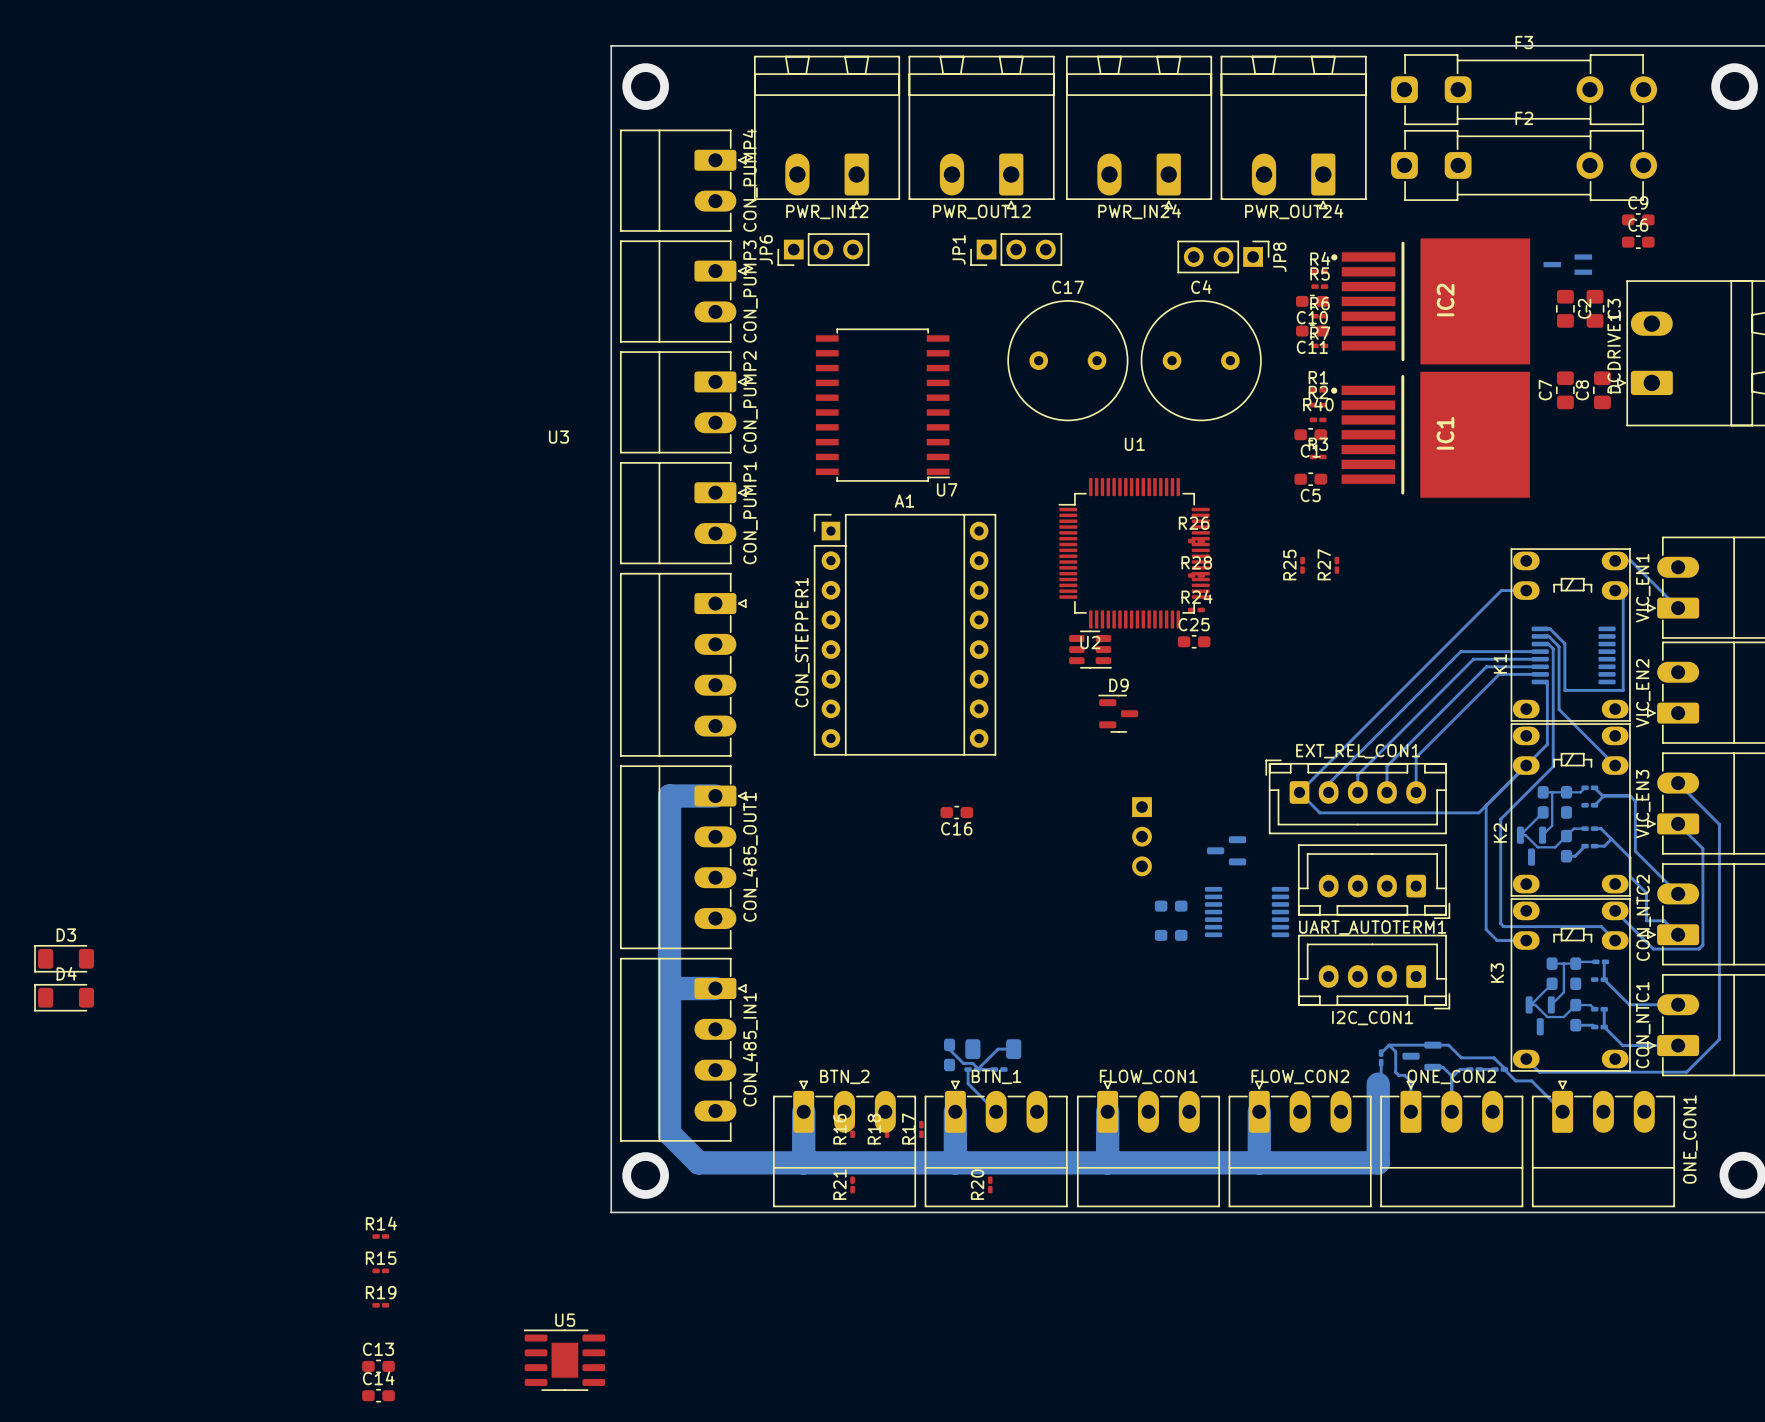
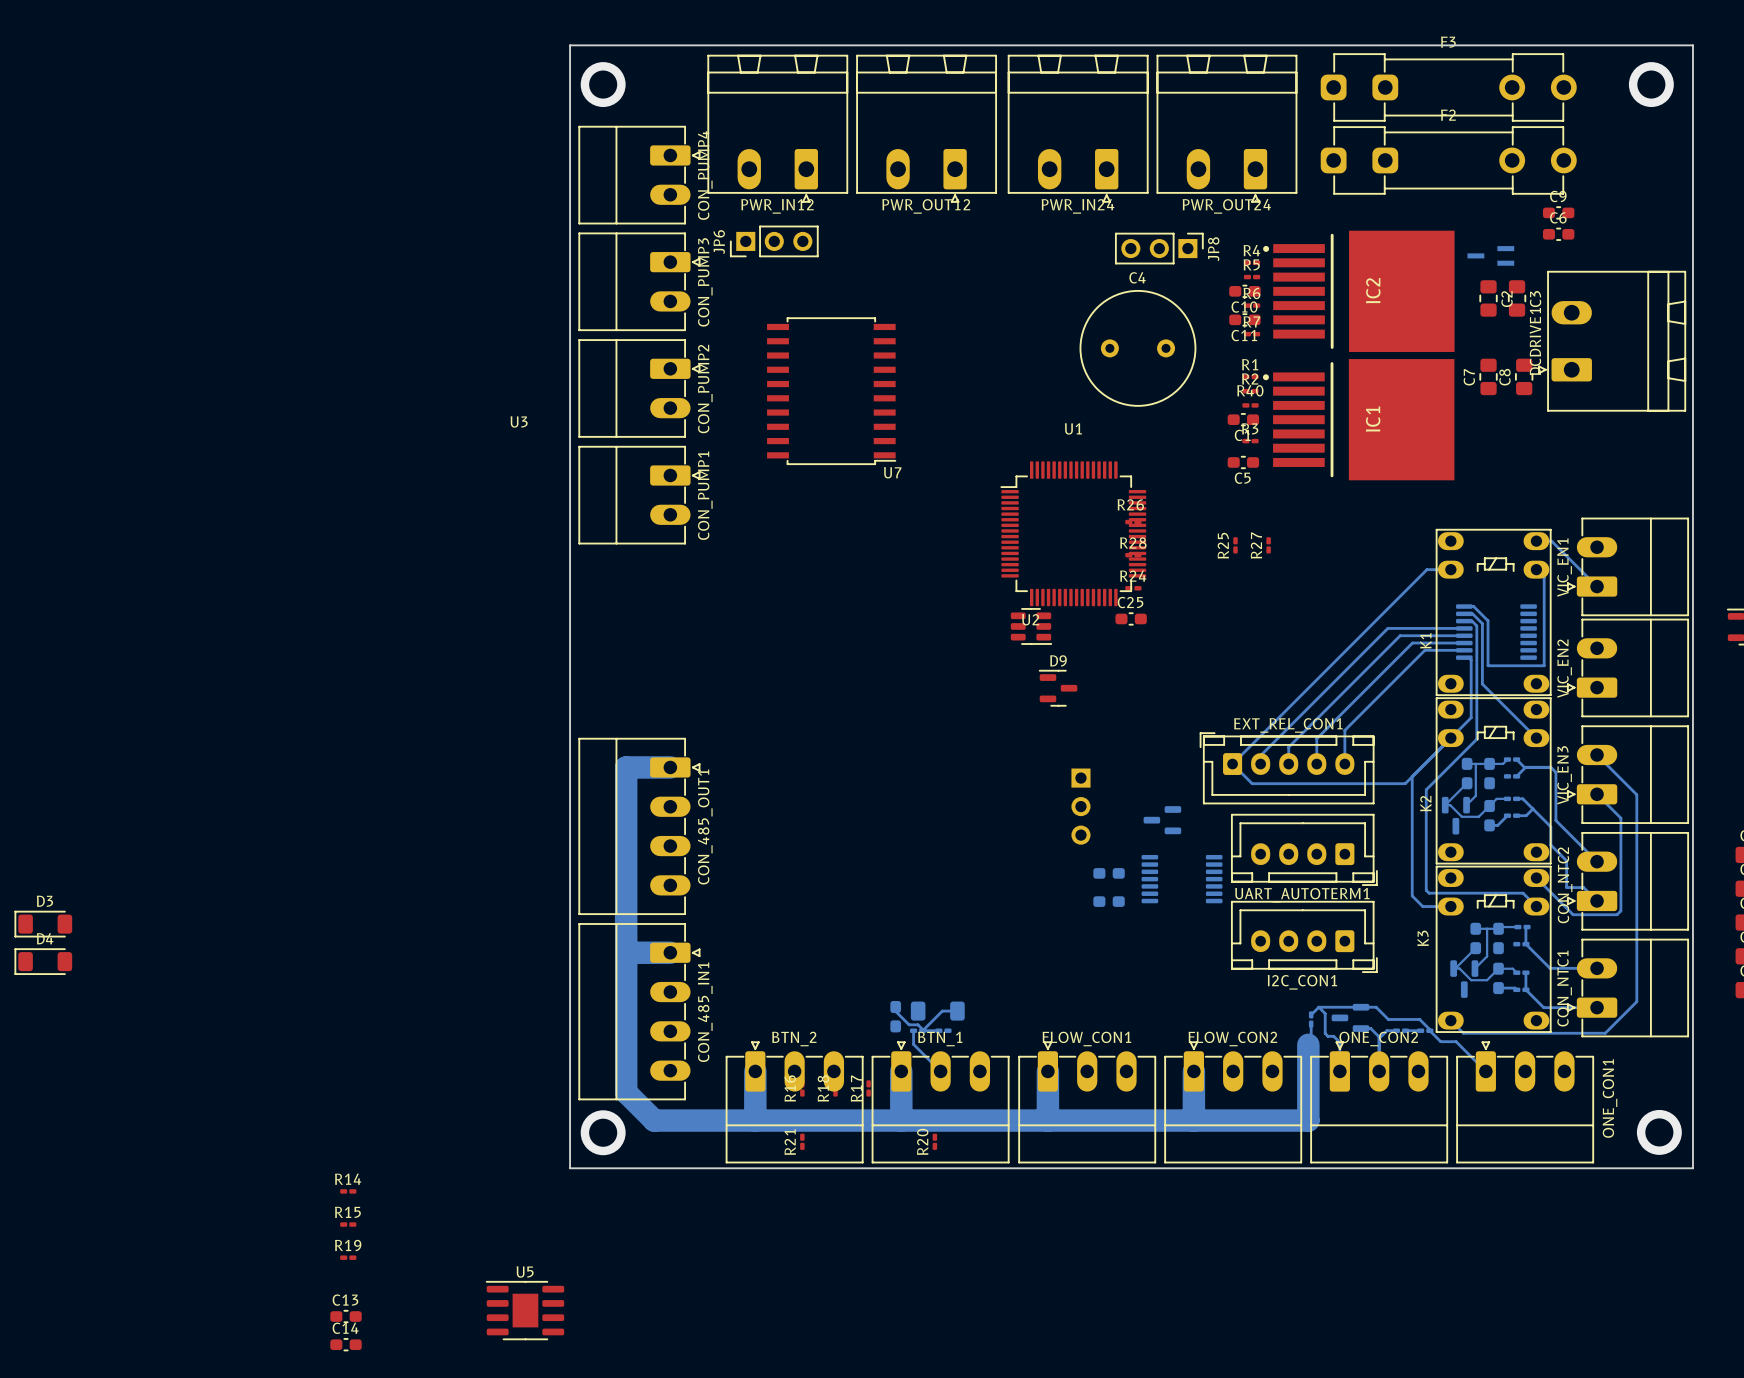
JP1: (1016, 249) -> none
C17: (1067, 360) -> none
A1: (905, 634) -> none
CON_STEPPER1: (683, 664) -> none
C16: (956, 812) -> none

